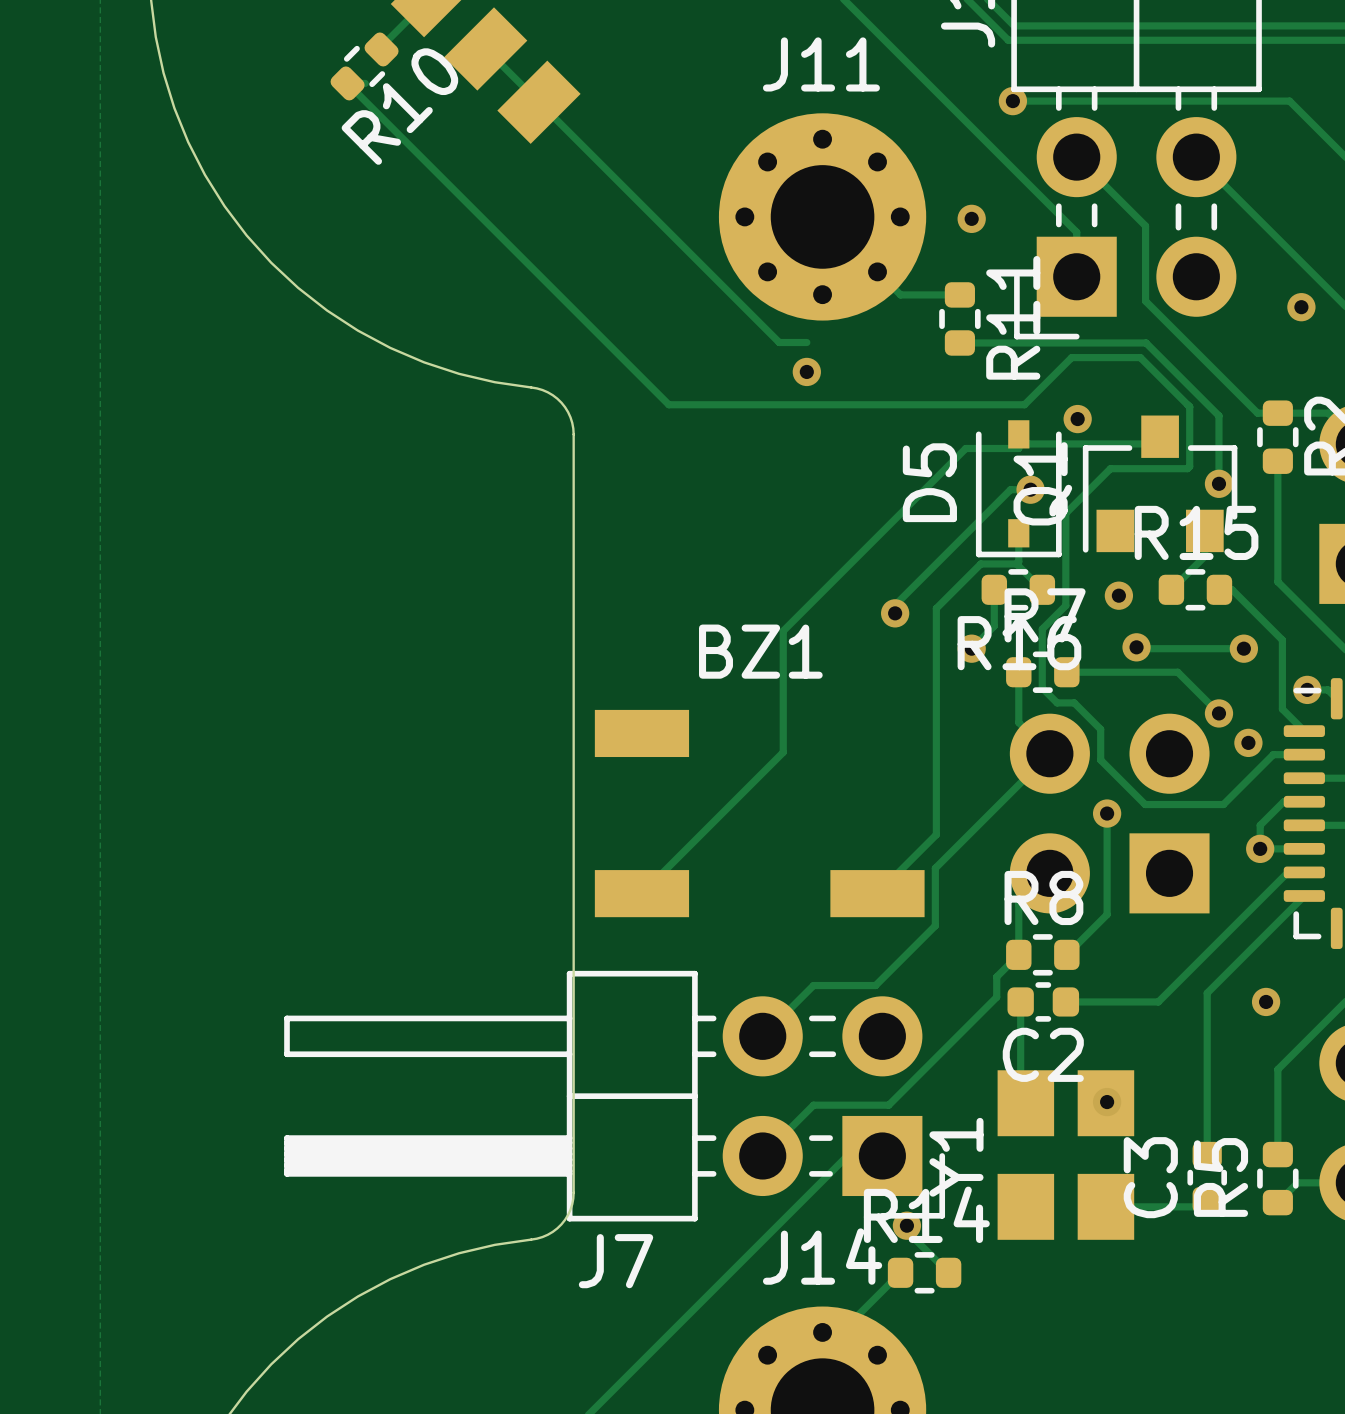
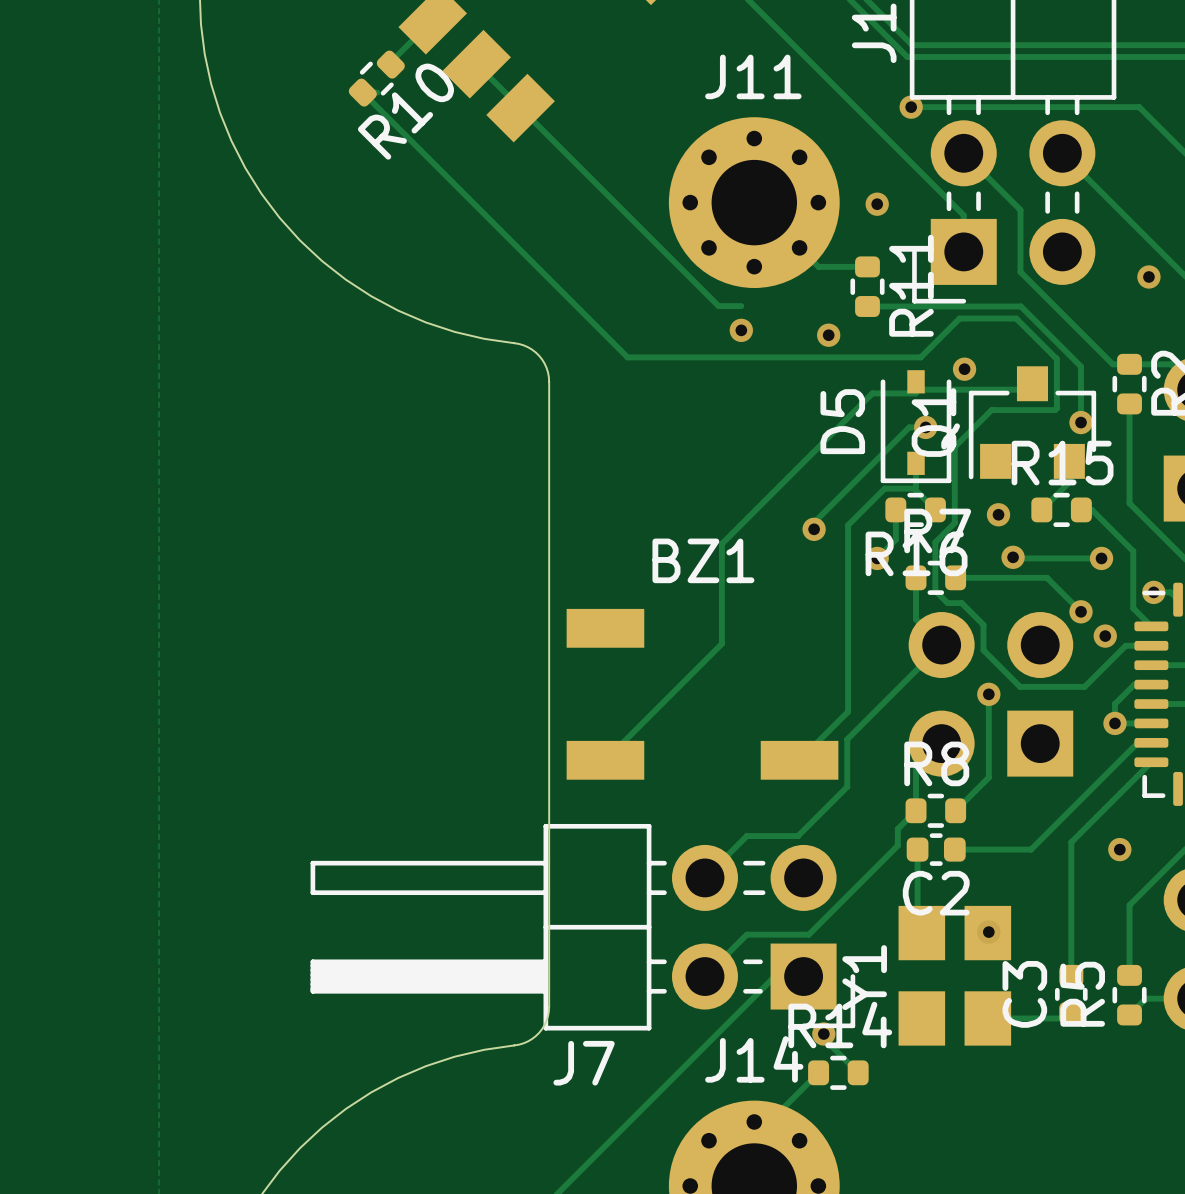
via: none -> (828, 335)

